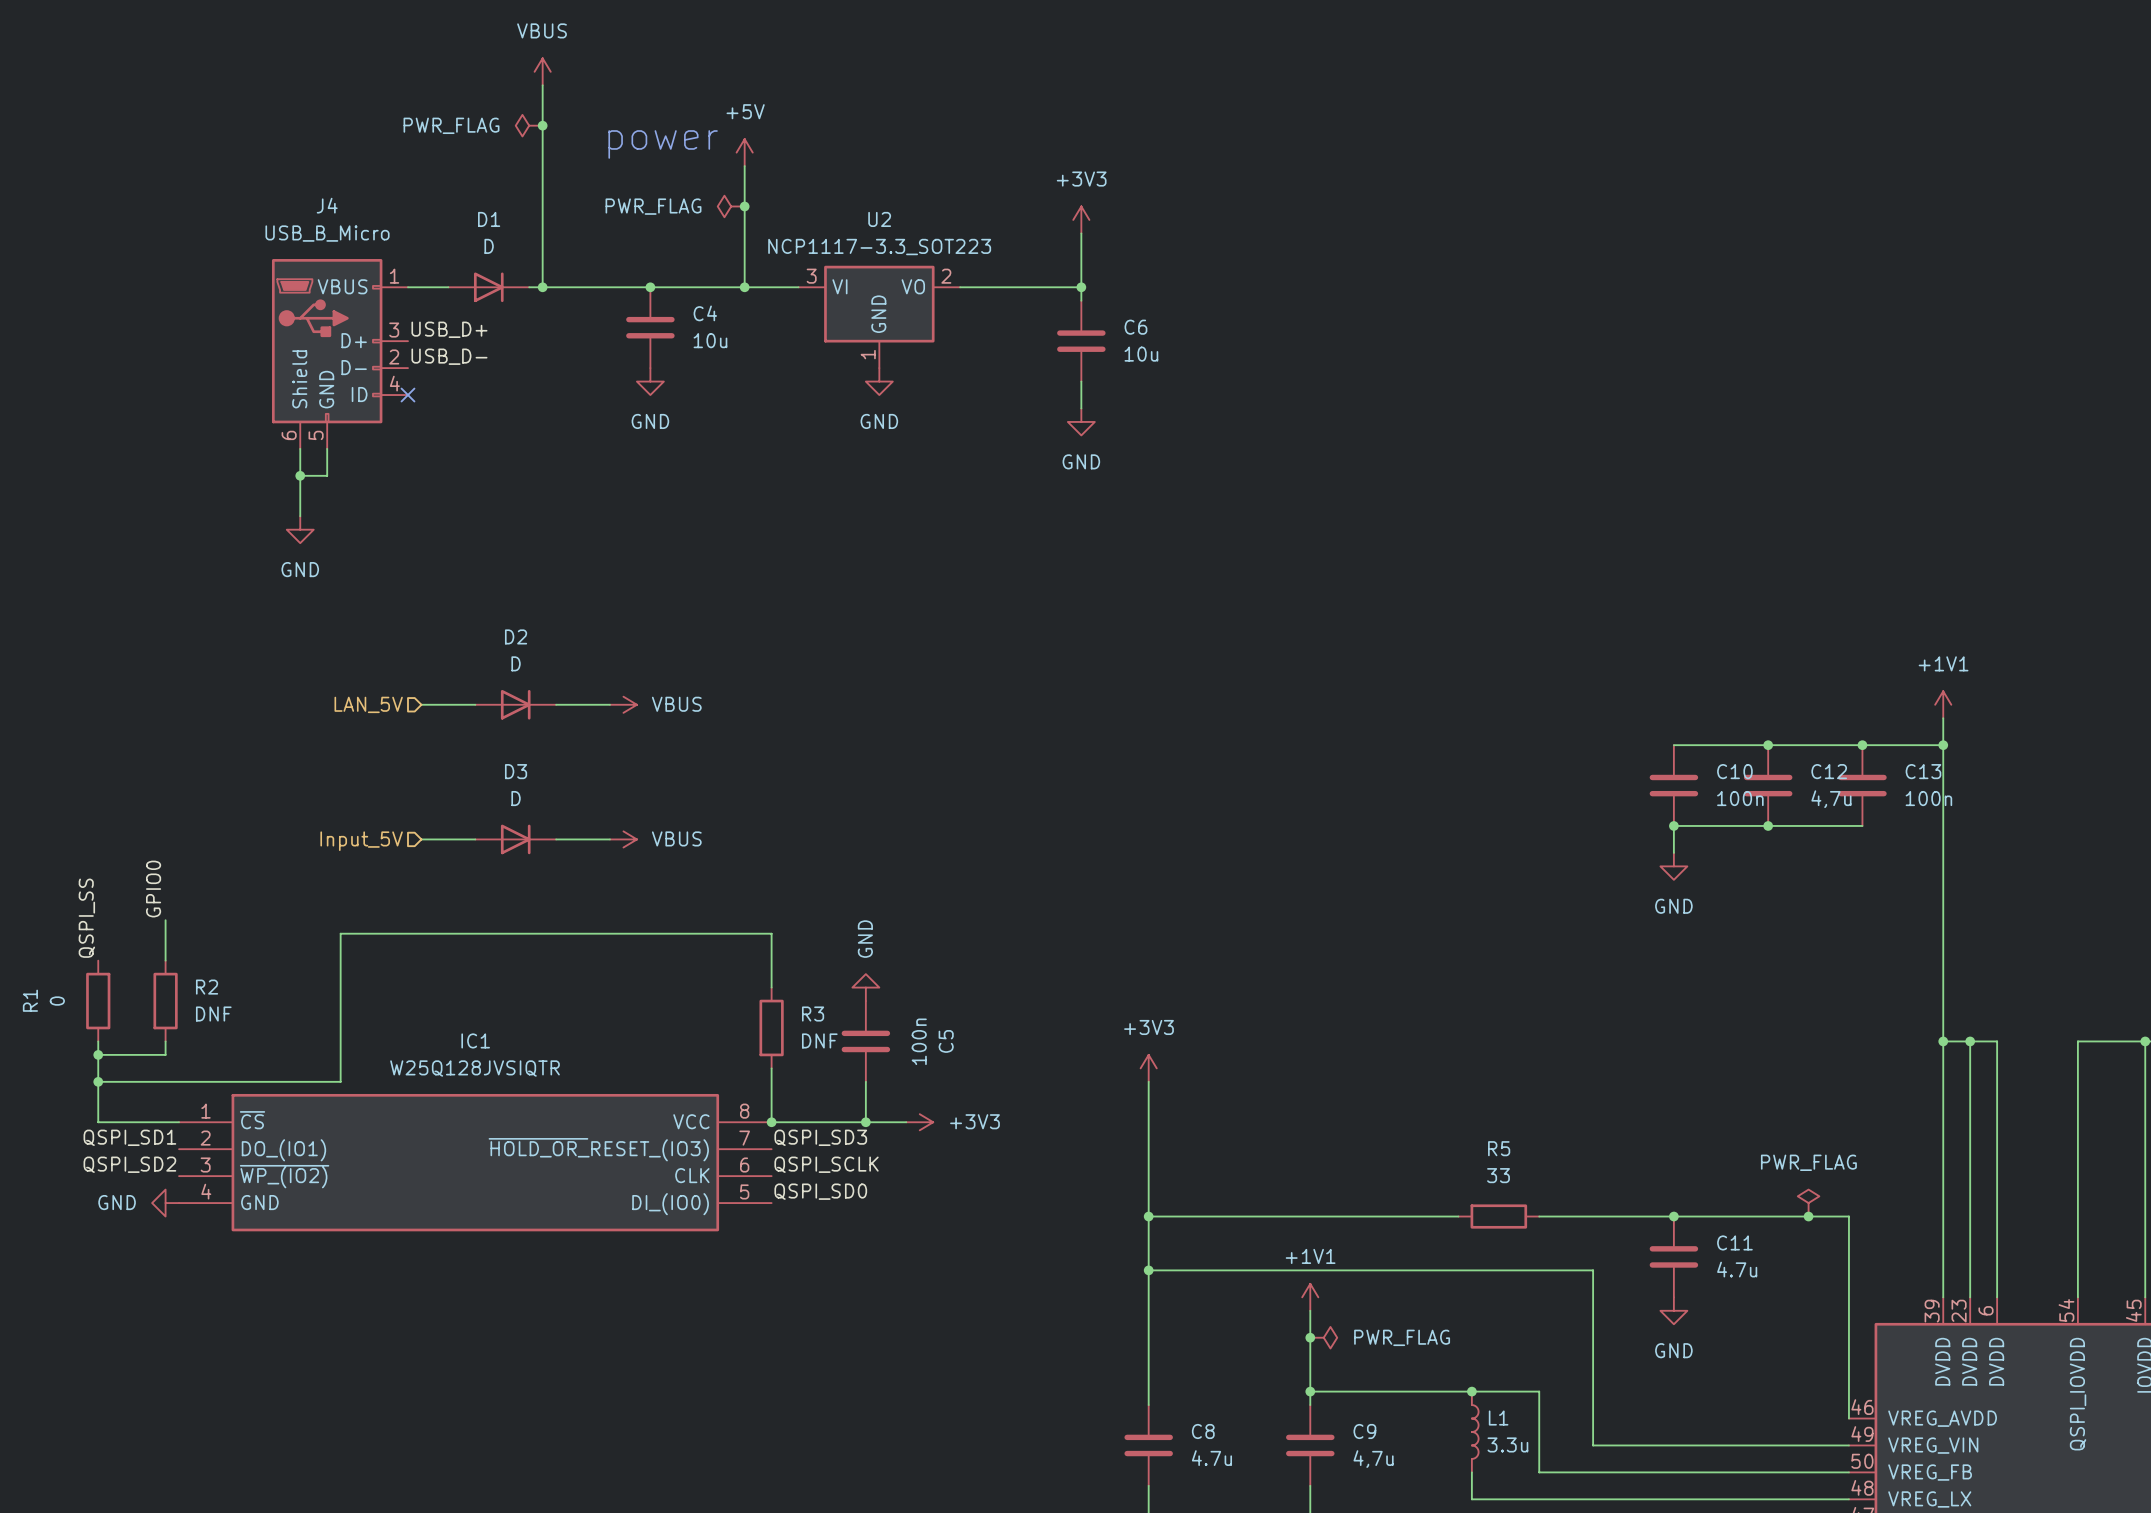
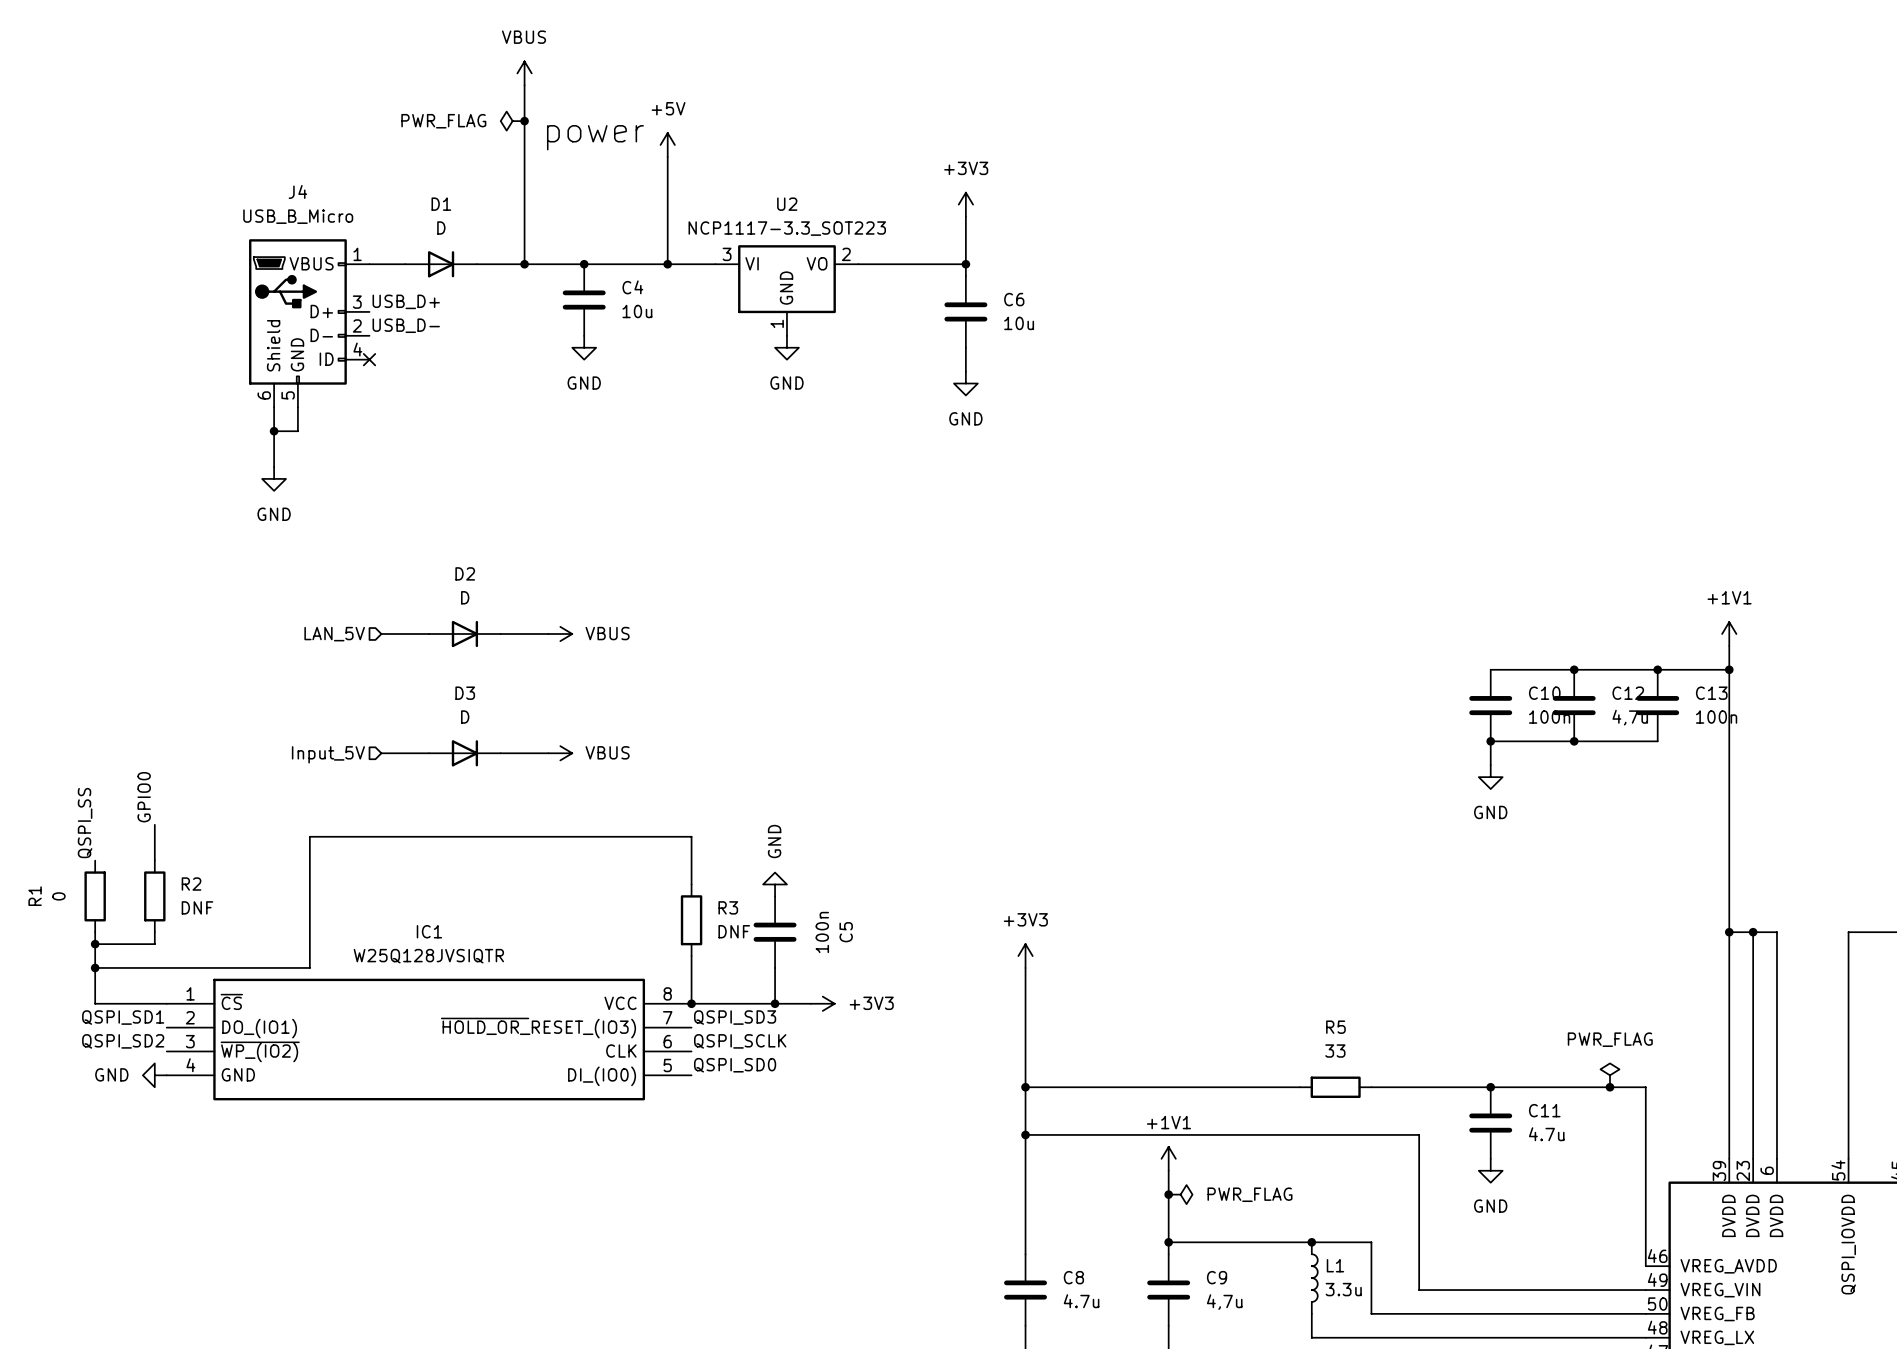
power symbol position: VBUS (542, 71) -> VBUS (524, 73)
wire: (542, 85) (542, 287) -> (524, 85) (524, 264)
power symbol position: PWR_FLAG (529, 125) -> PWR_FLAG (512, 121)
junction position: (542, 125) -> (524, 121)
power symbol: PWR_FLAG (731, 206) -> none
junction: (744, 206) -> none
junction position: (542, 287) -> (524, 264)

